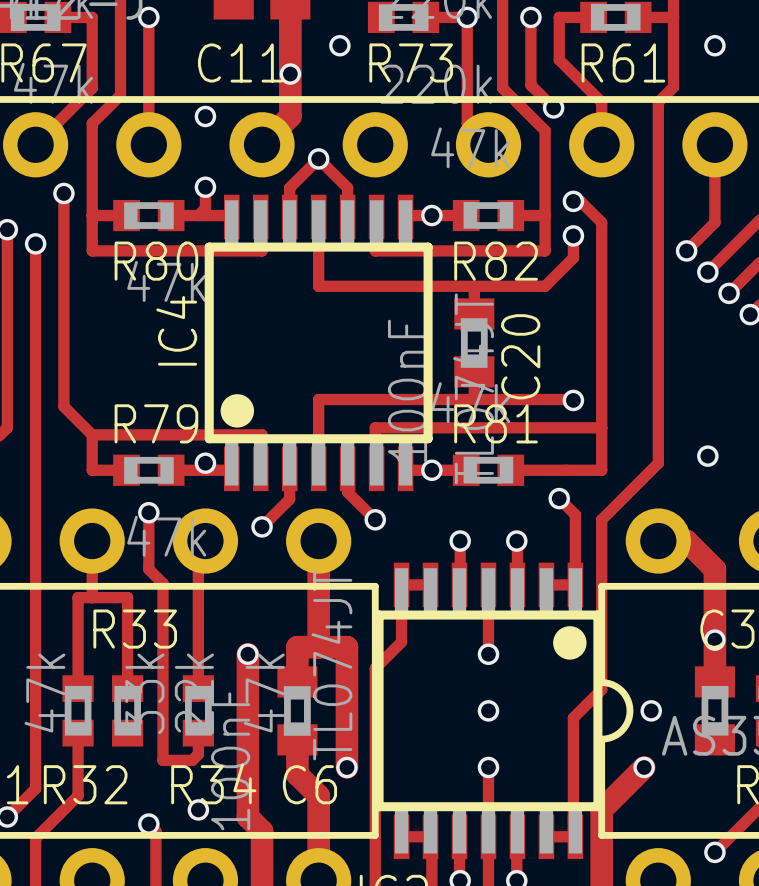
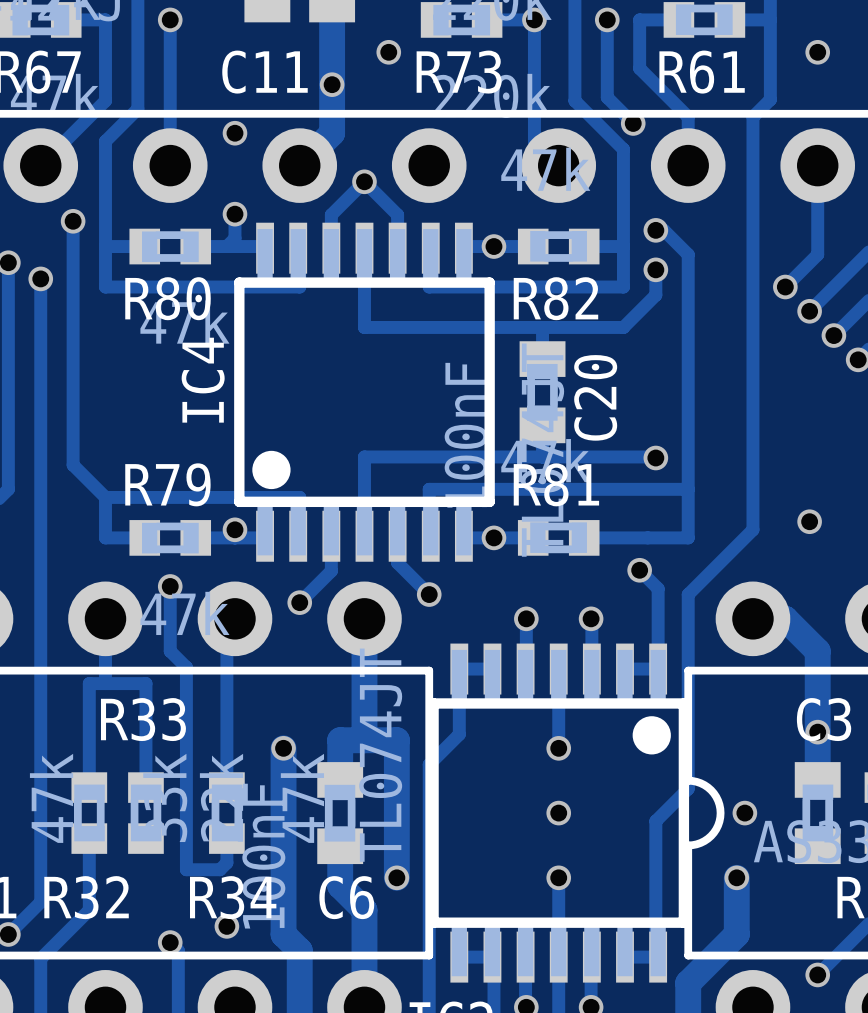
track: (644, 767) (601, 809) (601, 859) -> (736, 877) (736, 934) (688, 983)

